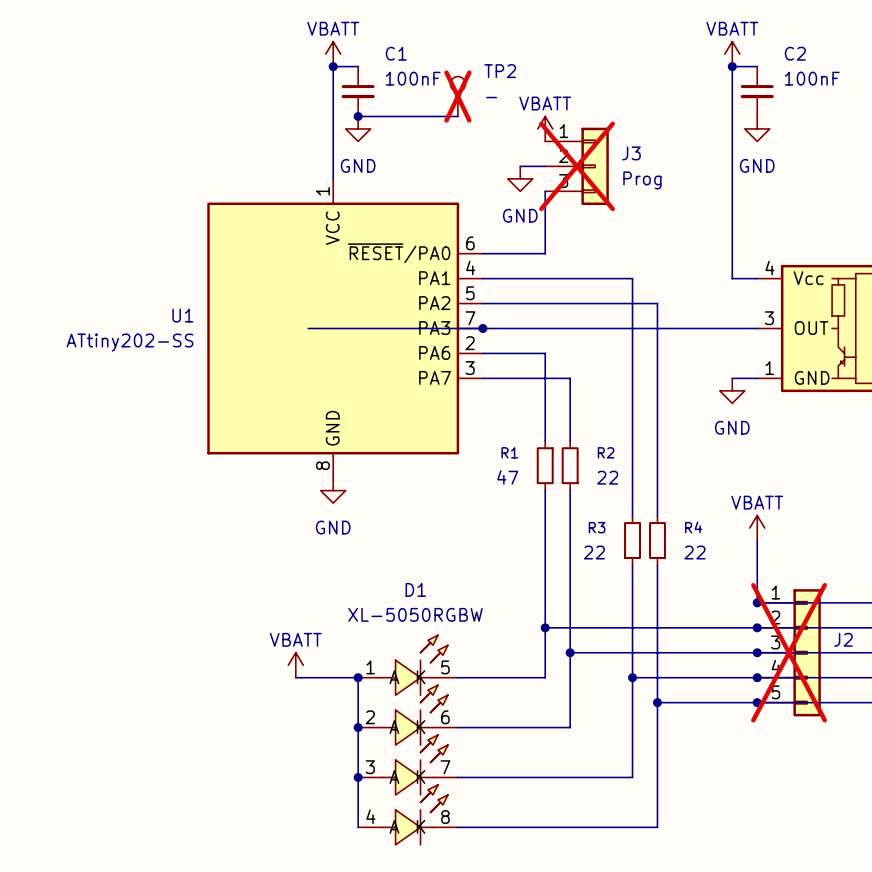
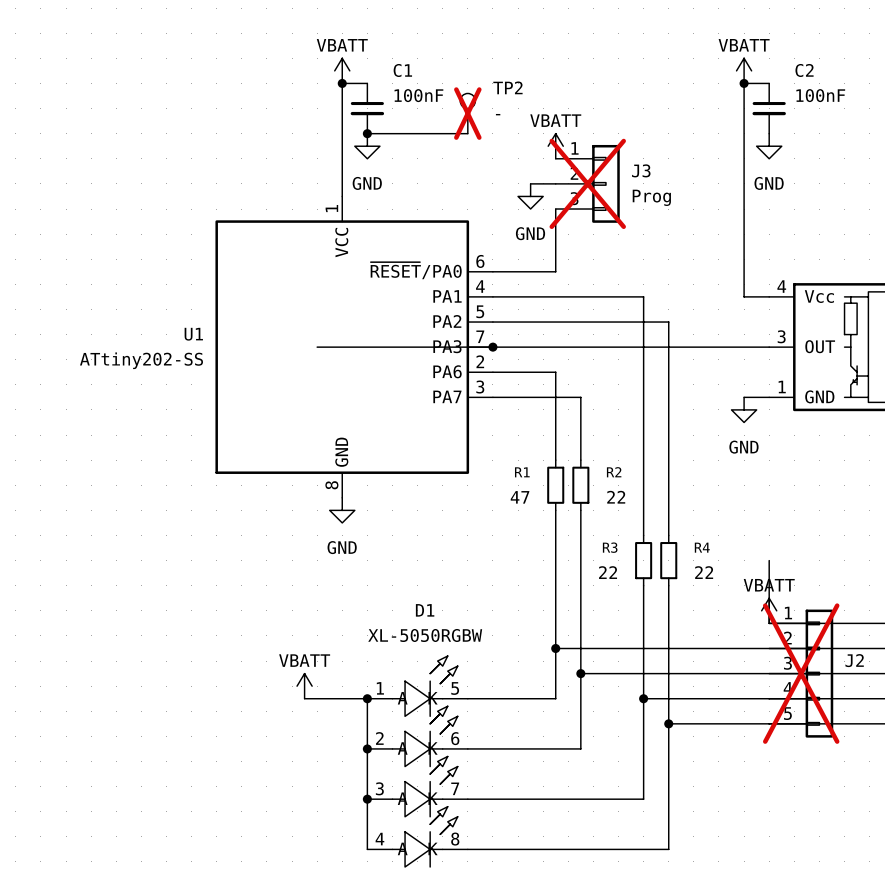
power symbol position: VBATT (757, 528) -> VBATT (769, 610)
junction: (757, 602) -> none
junction: (757, 627) -> none
junction: (757, 652) -> none
junction: (757, 677) -> none
junction: (757, 702) -> none

